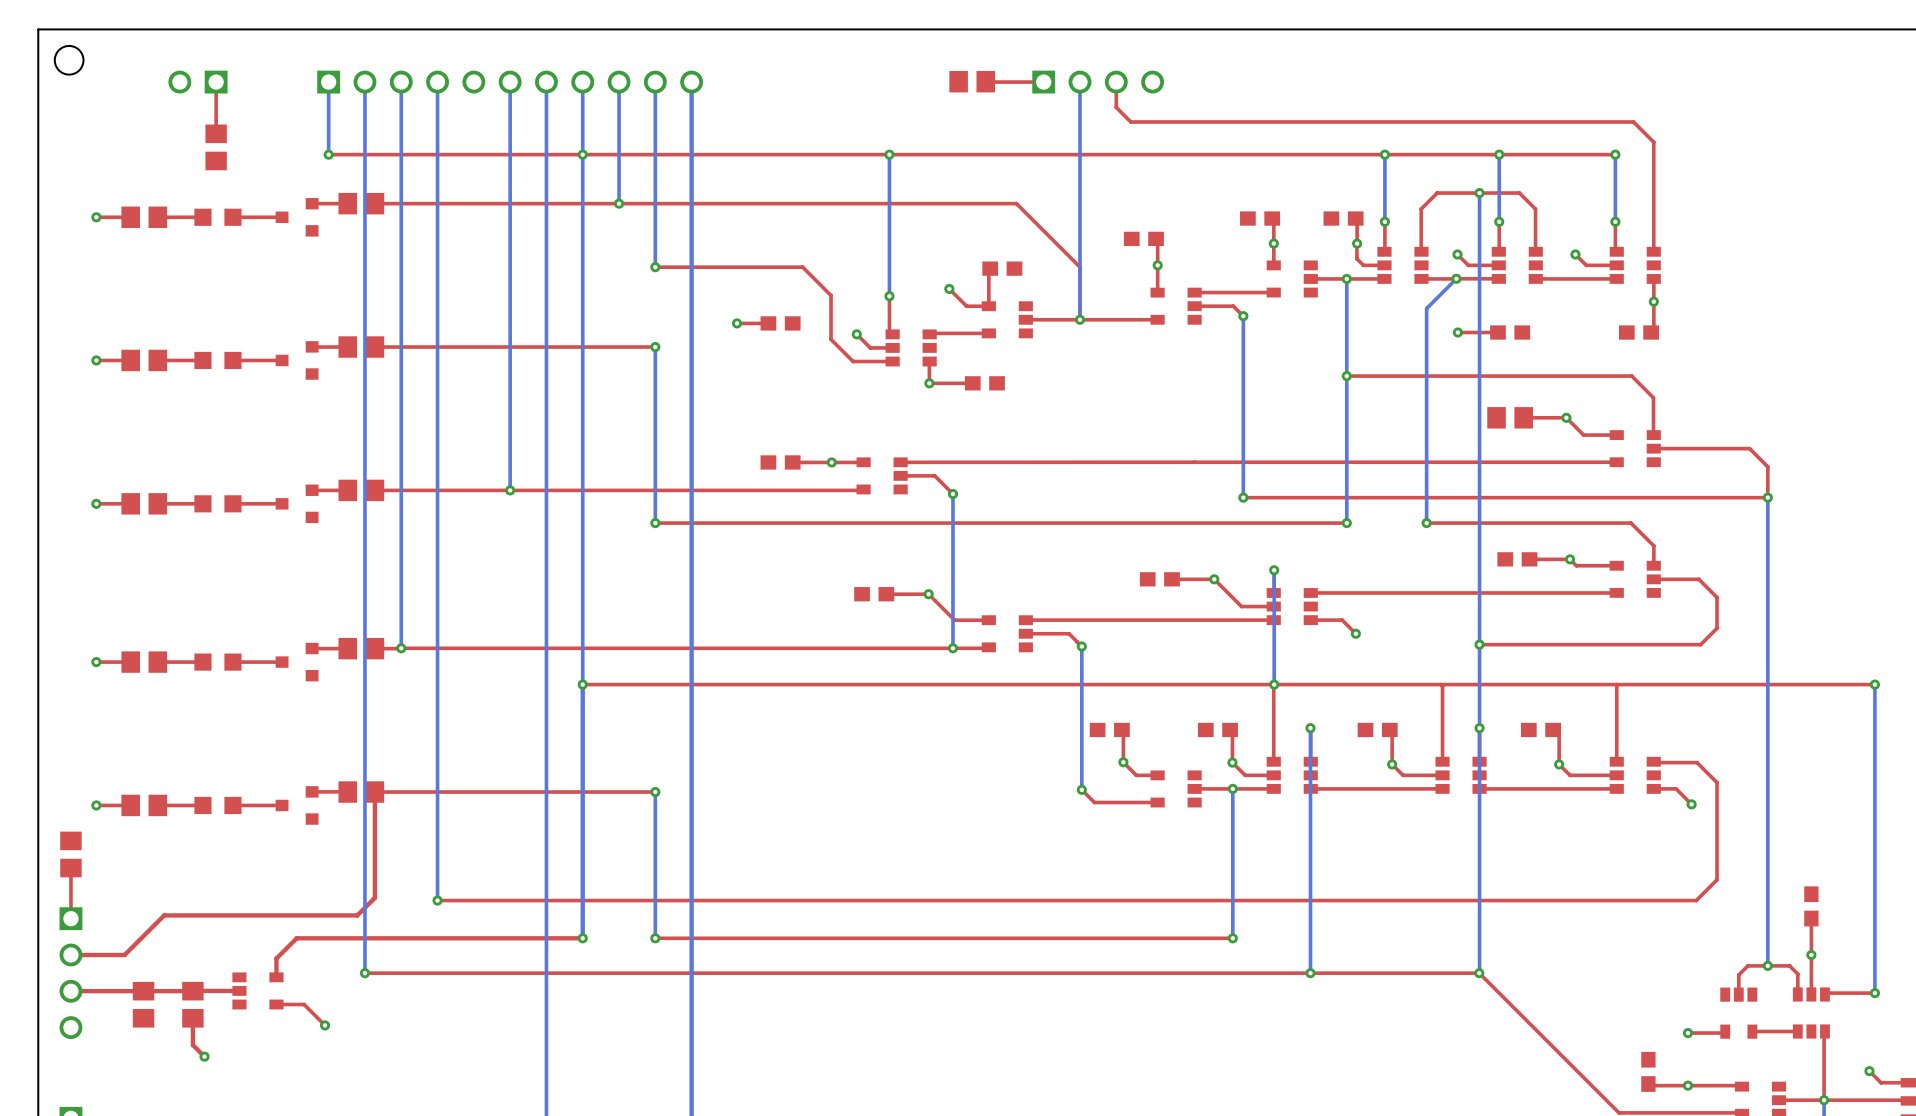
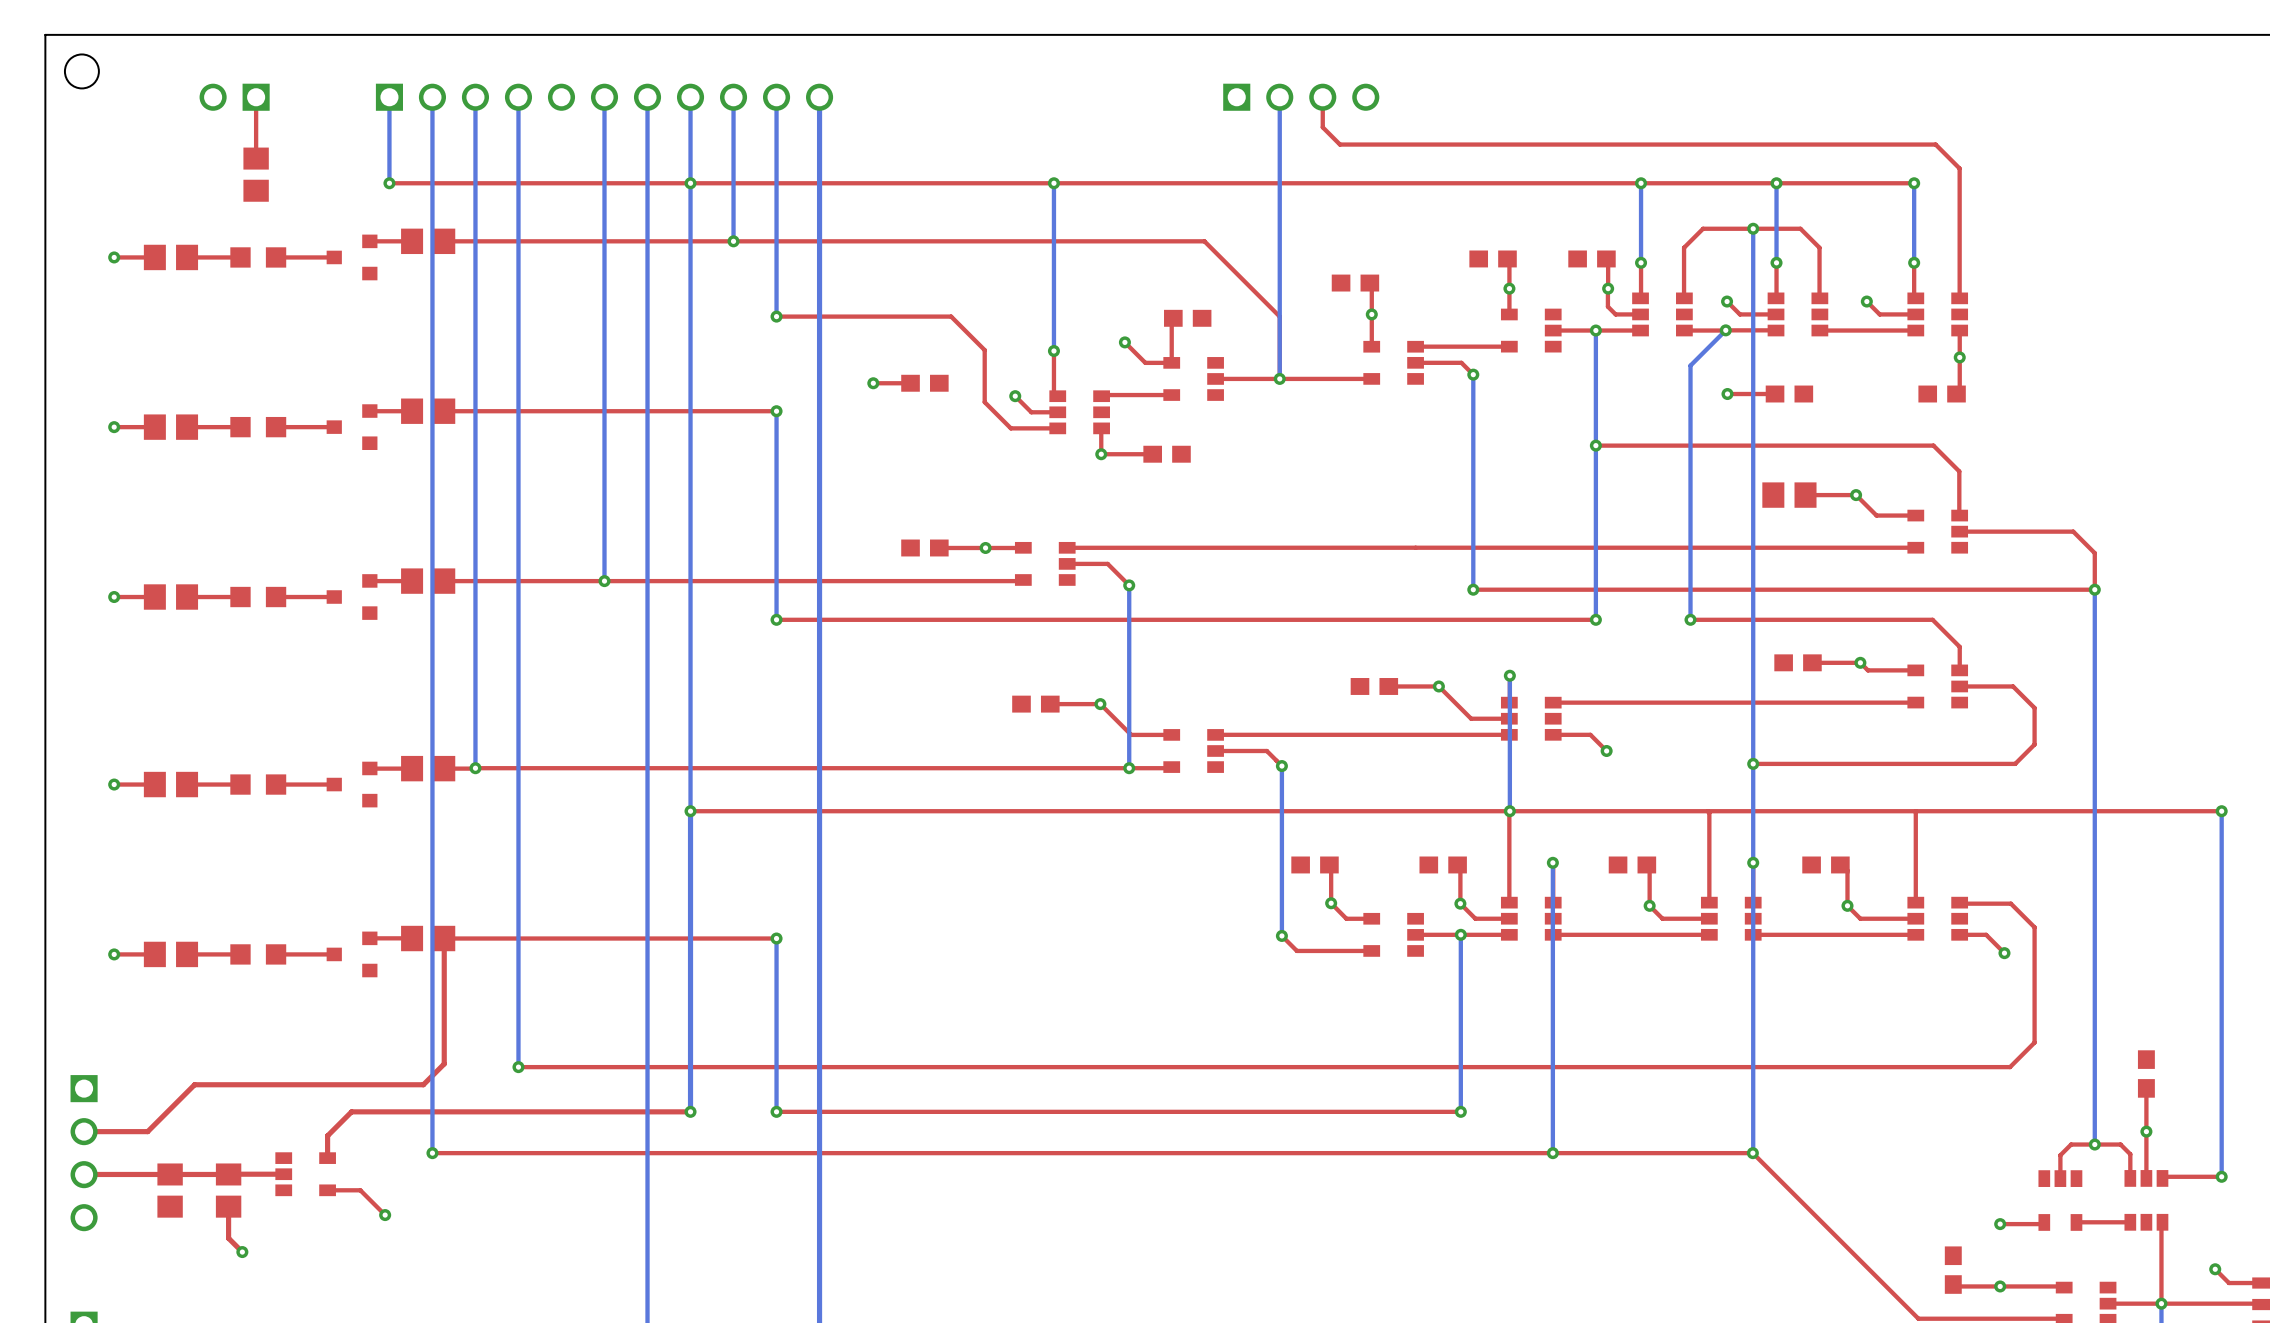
part: (972, 81) -> none
top track: (985, 81) (1043, 82) -> none
part: (70, 854) -> none
top track: (70, 868) (70, 918) -> none

